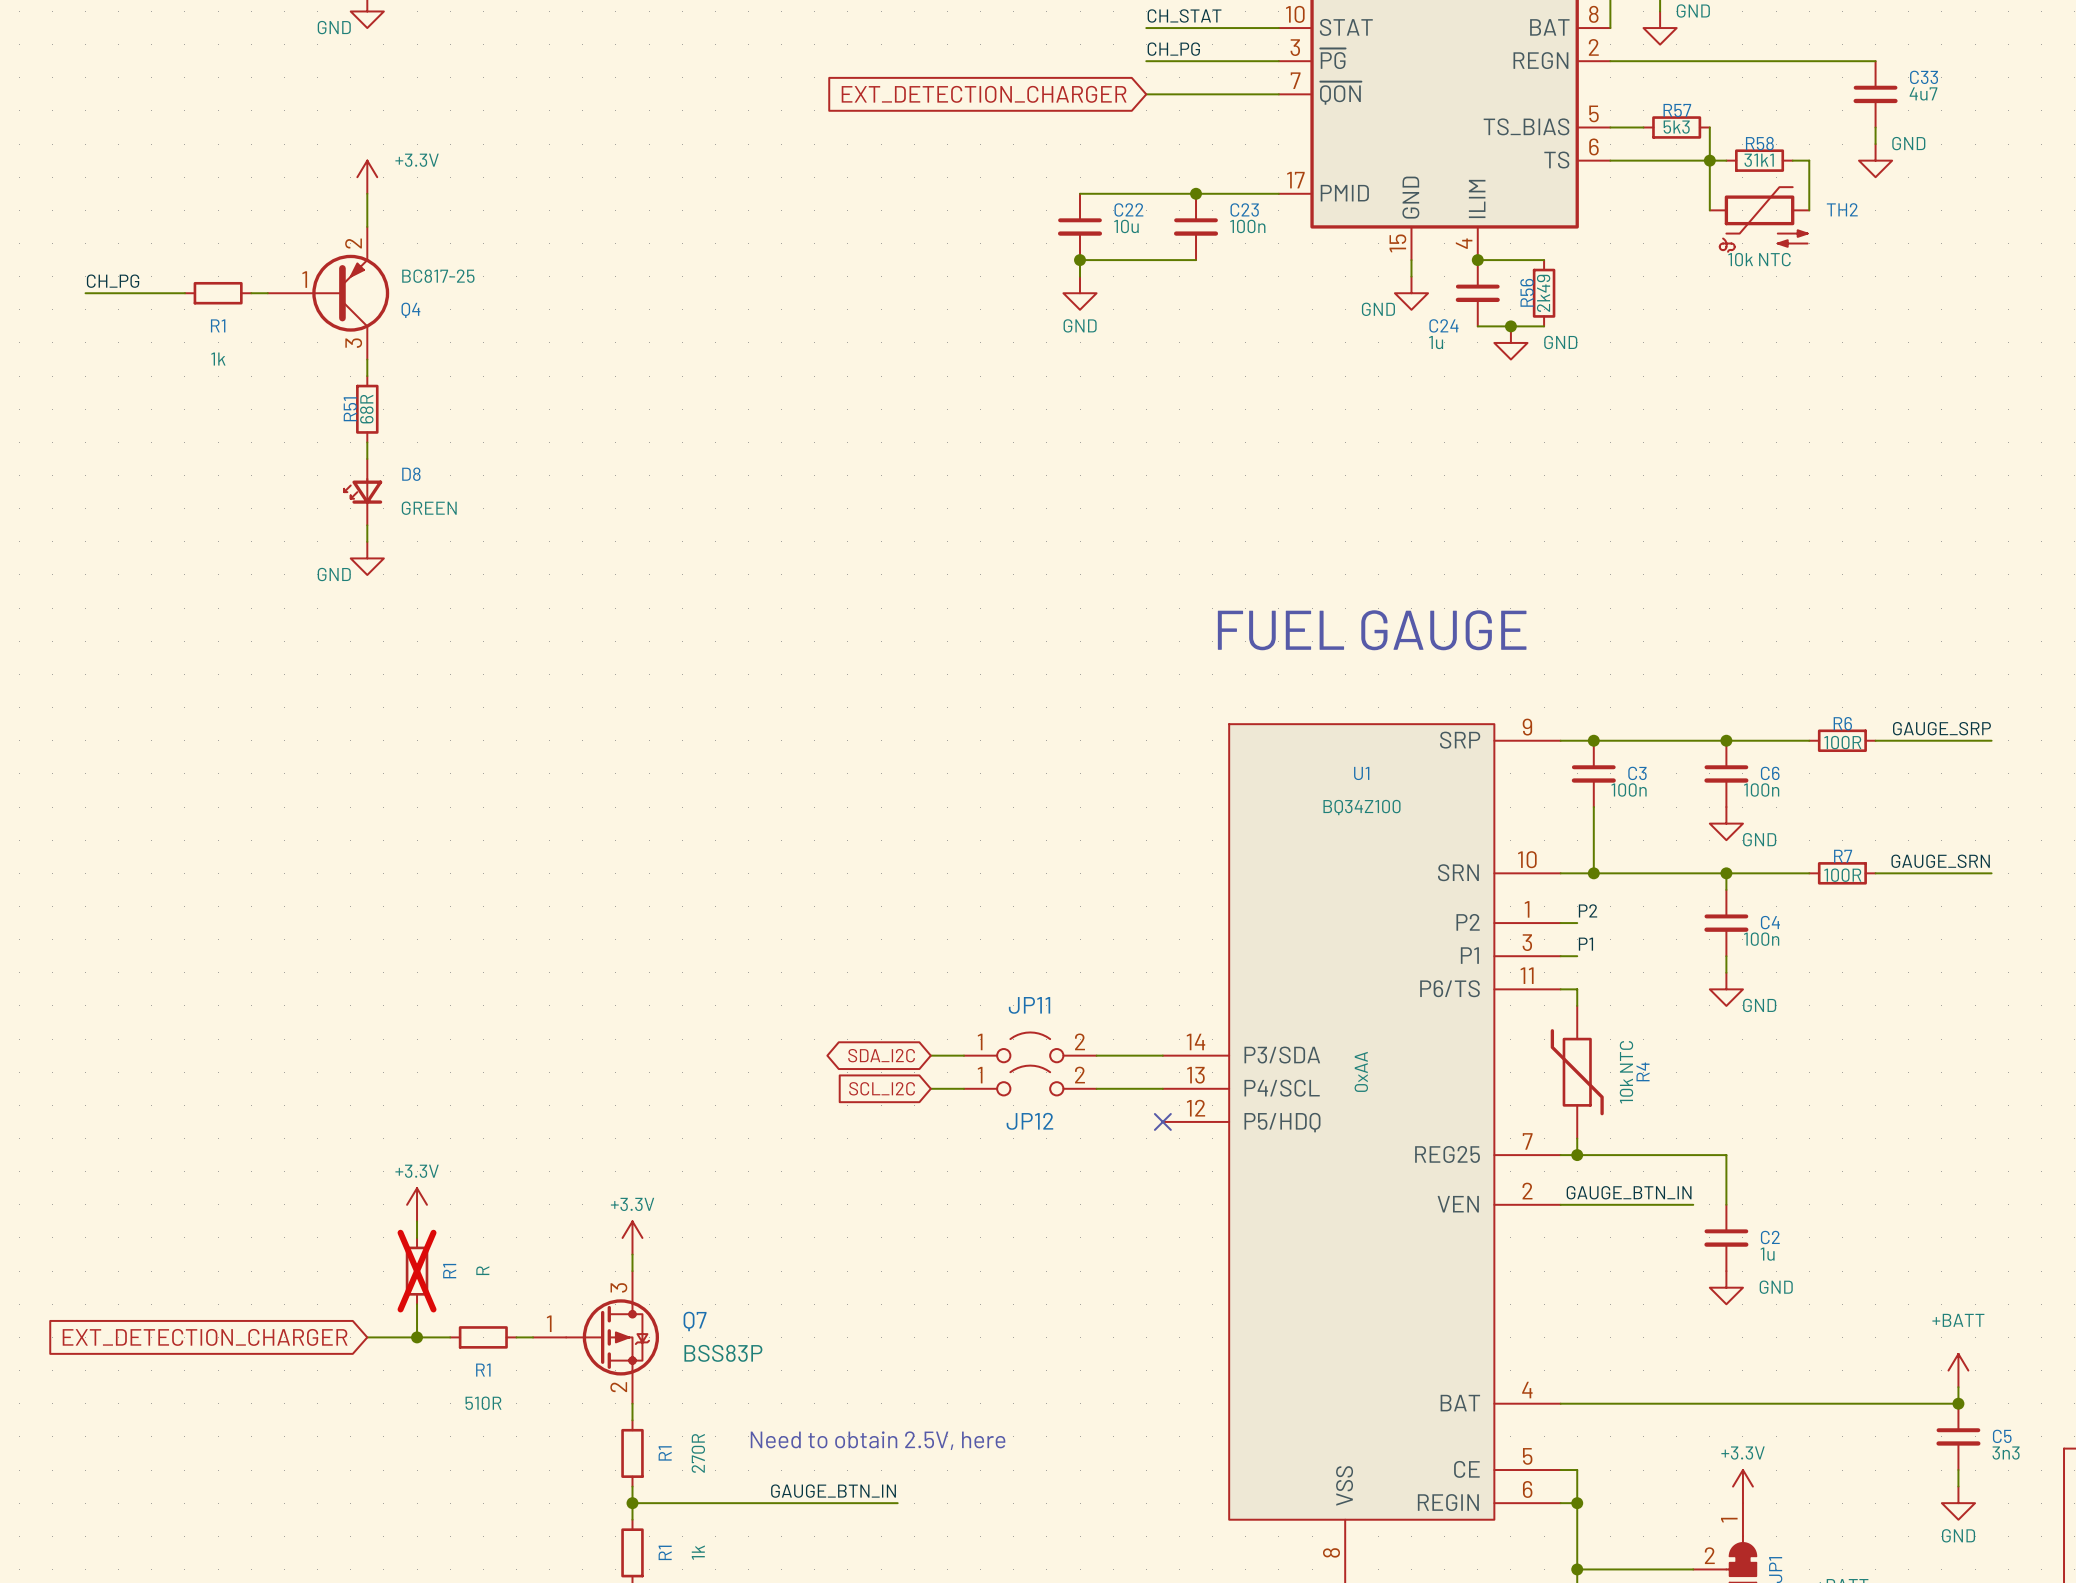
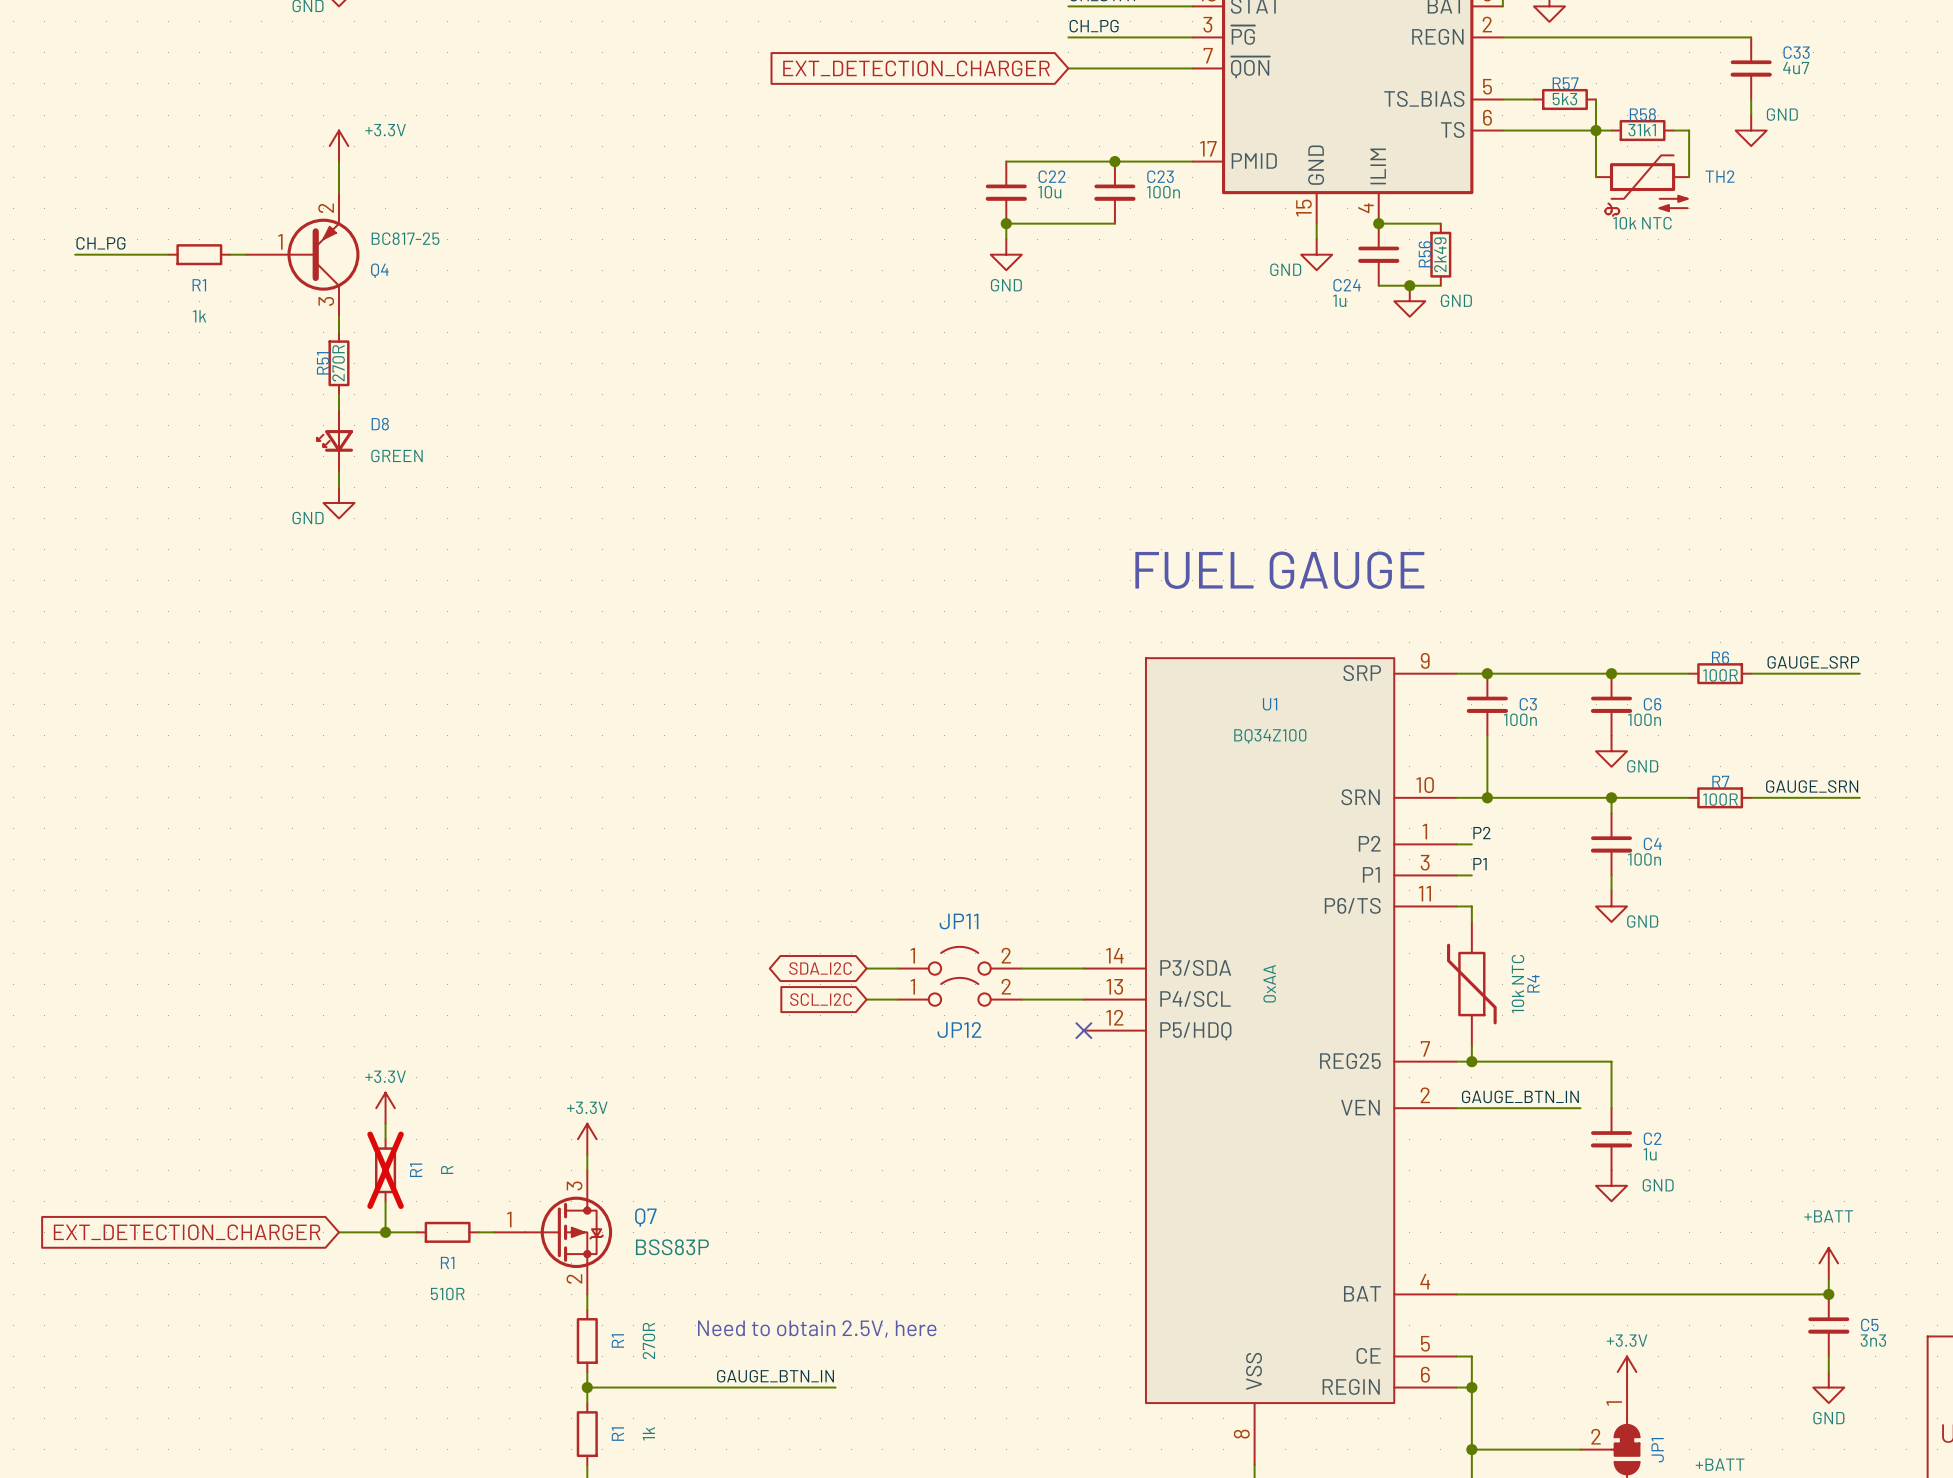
R51 value: 68R (366, 409) -> 270R (338, 363)

